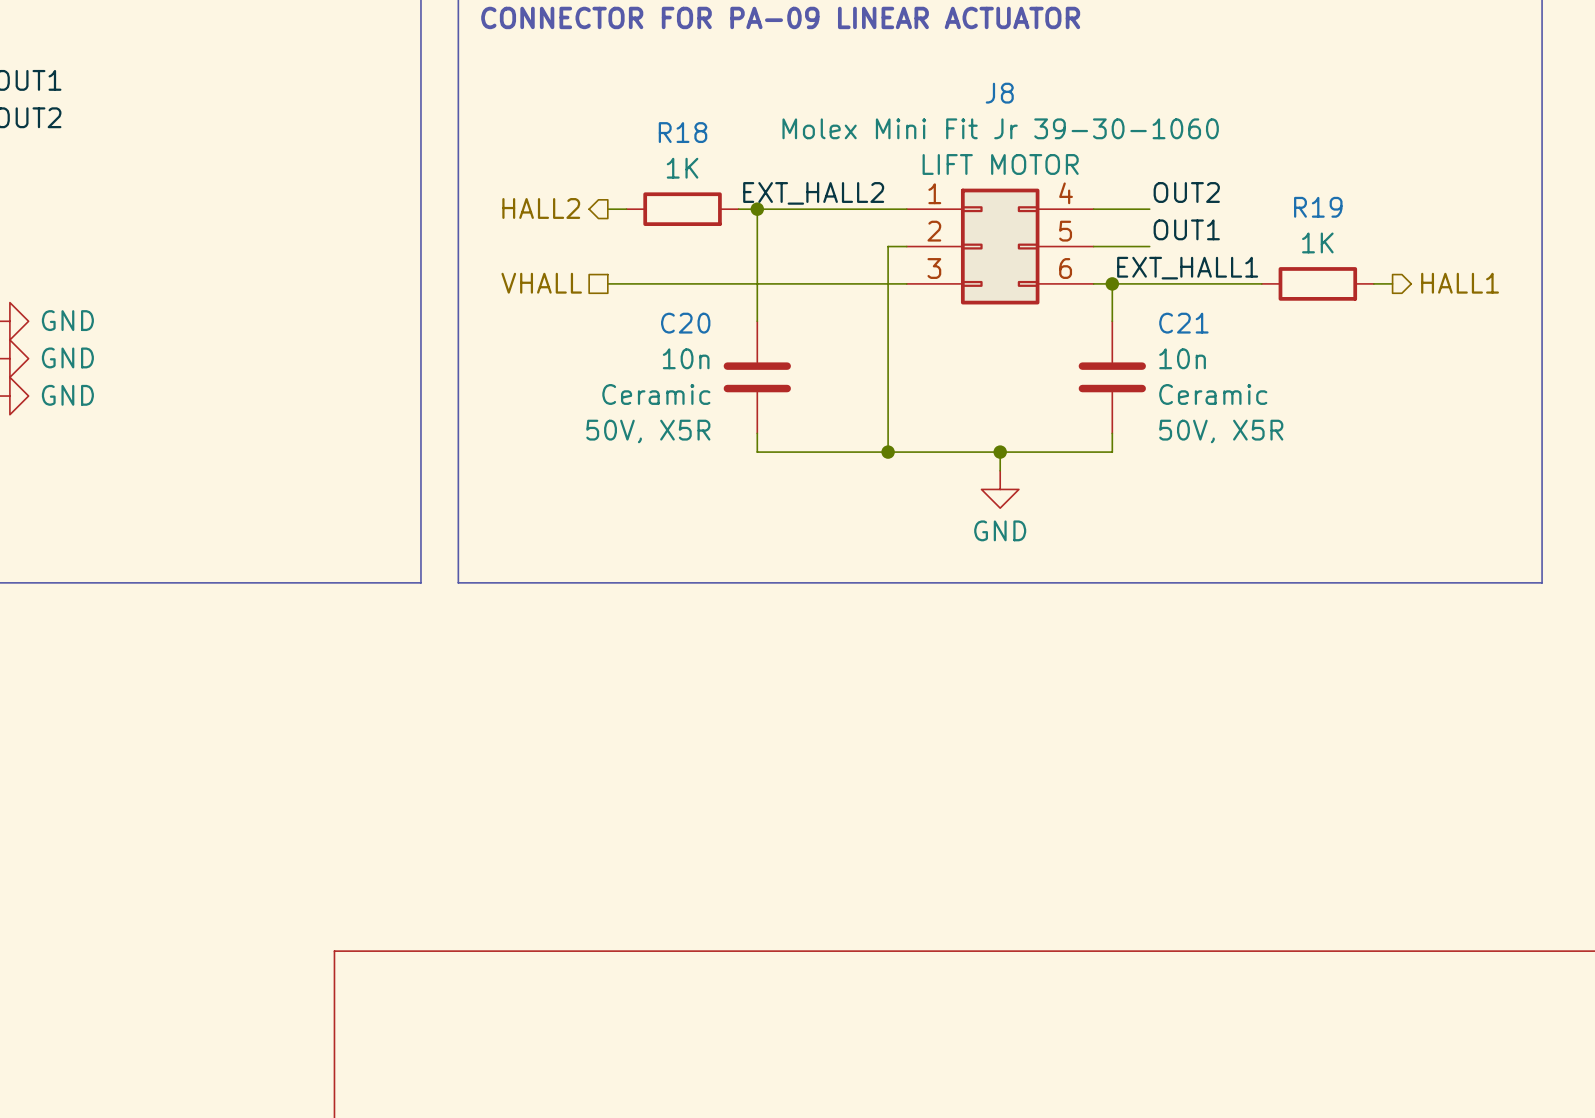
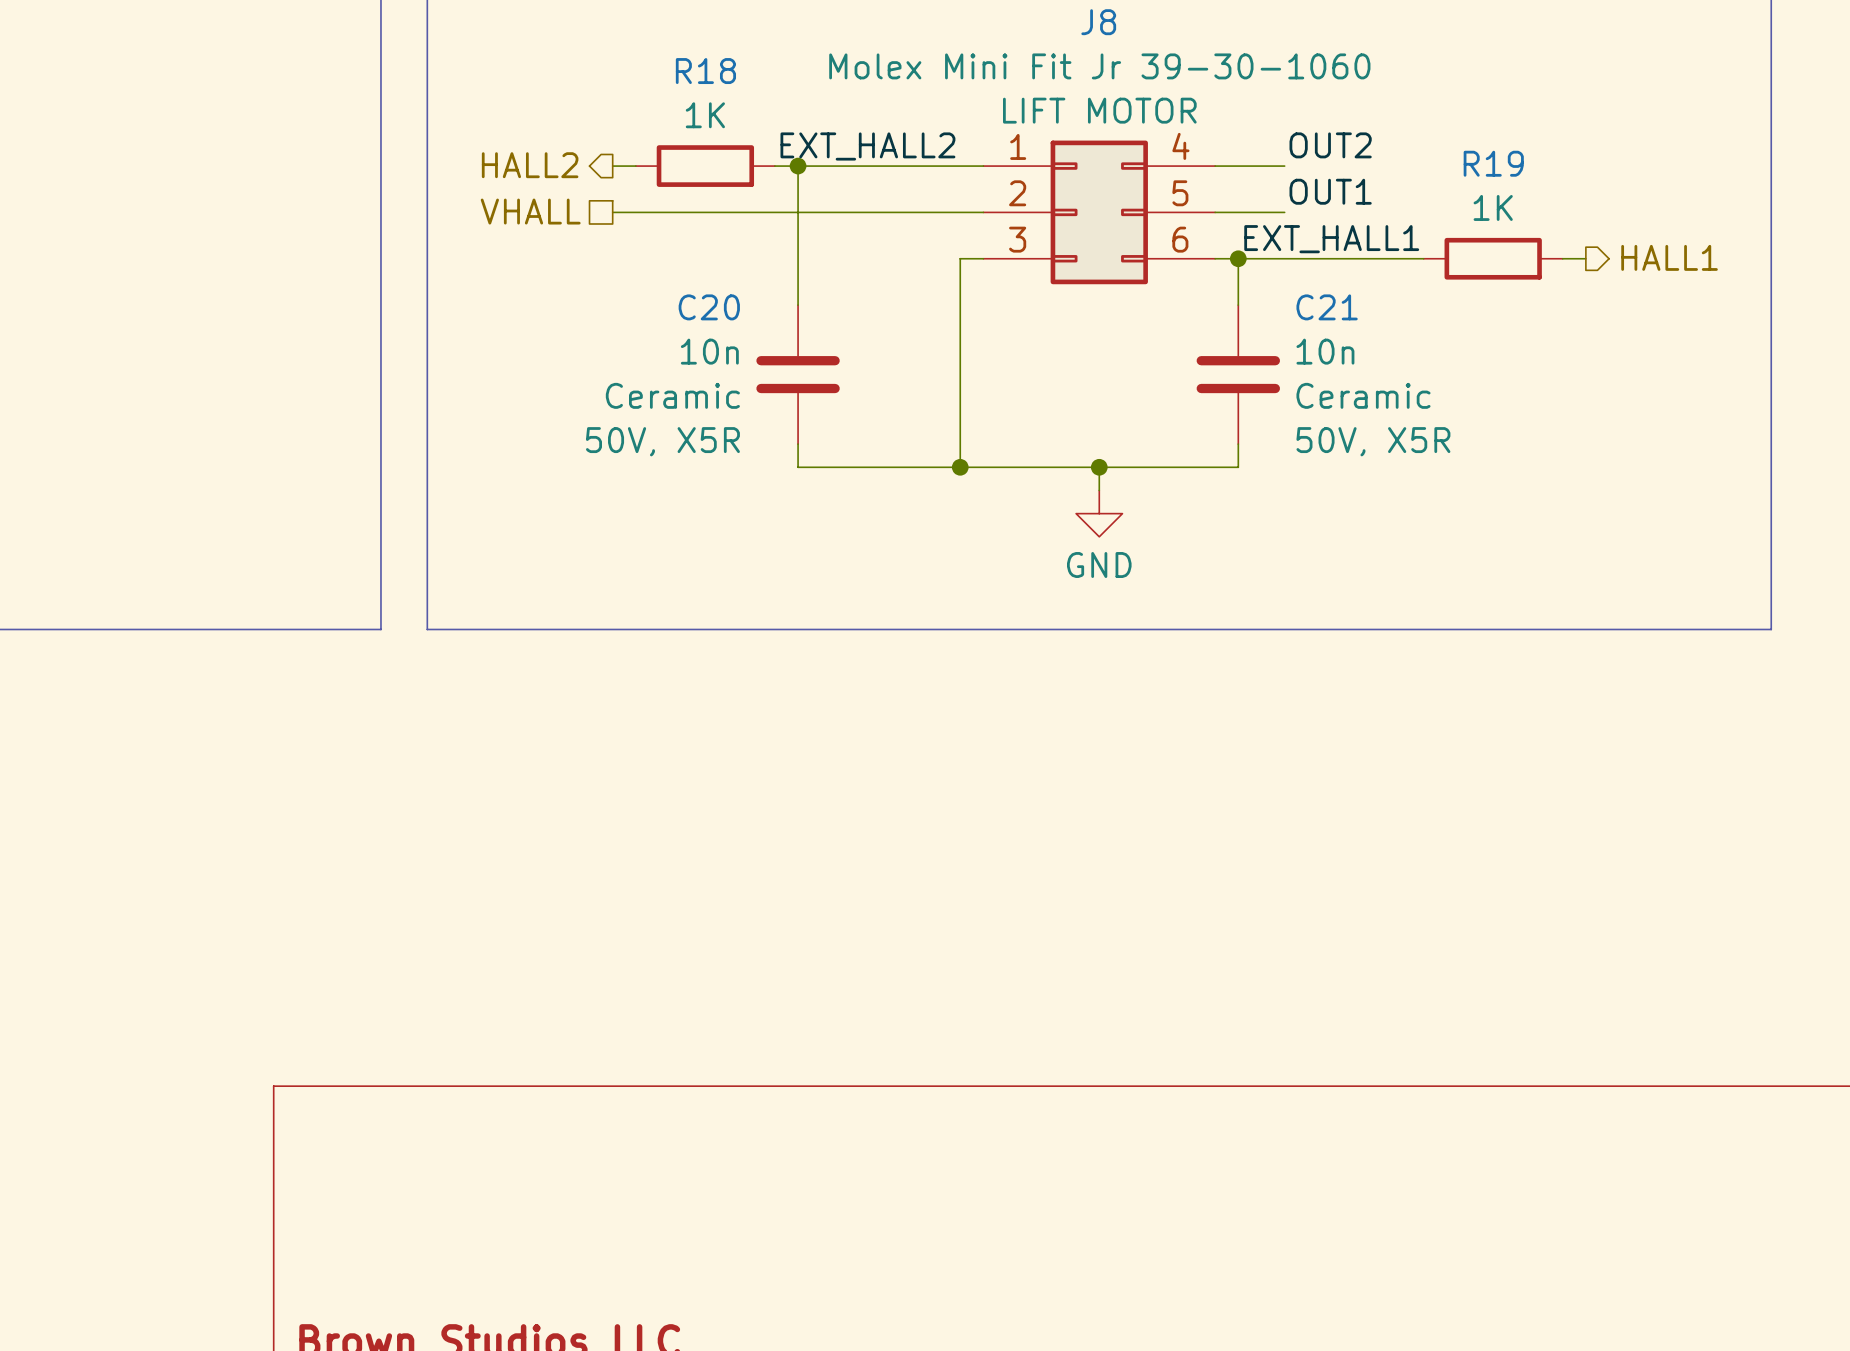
wire: (888, 246) (888, 283) (607, 283) -> (960, 212) (612, 212)
hierarchical label position: VHALL (541, 283) -> VHALL (530, 211)

